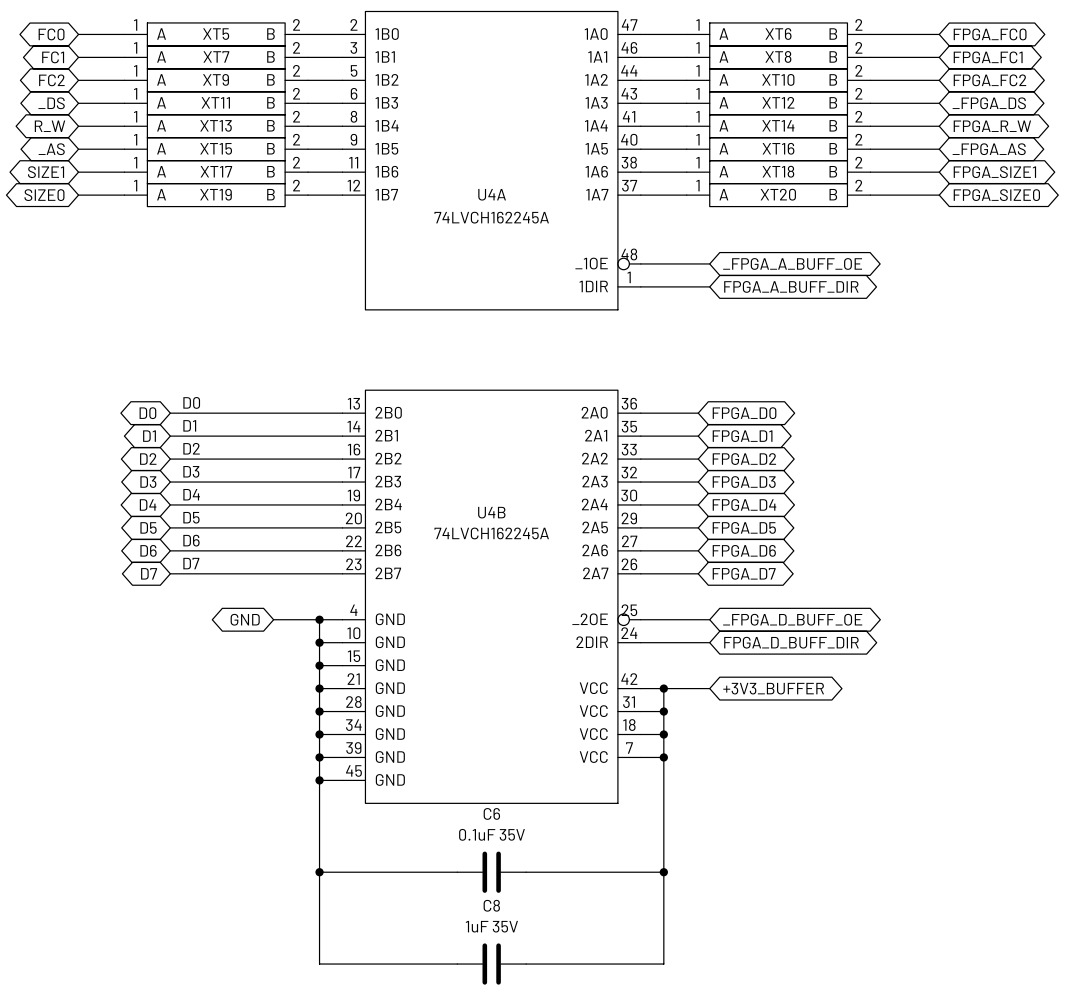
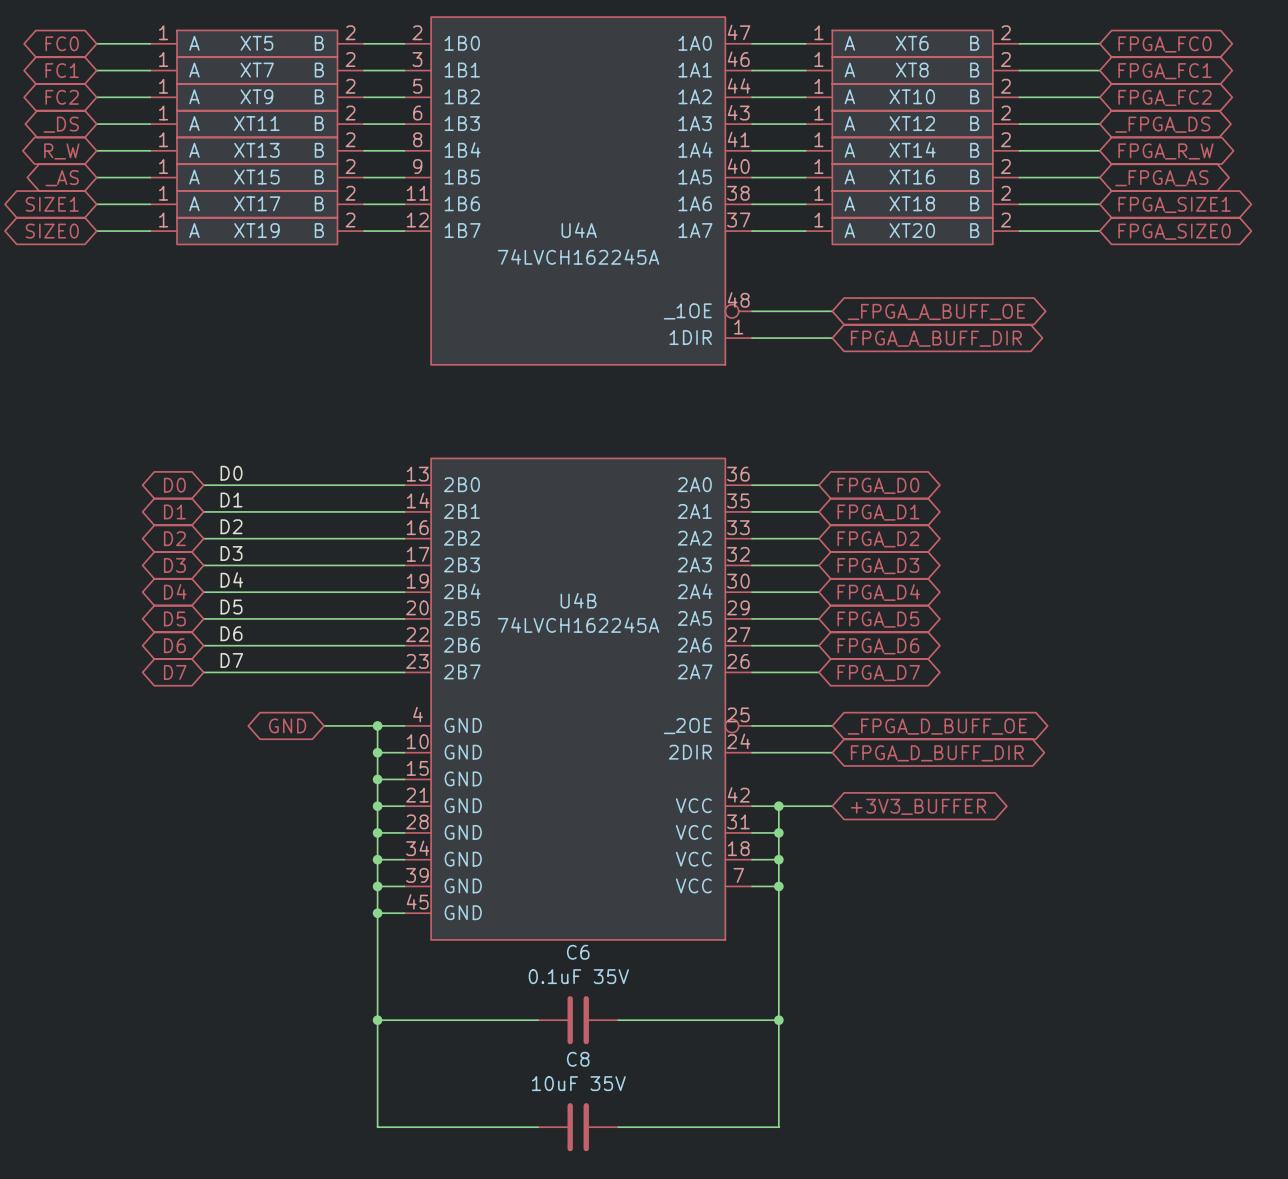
C8 value: 1uF 35V (491, 926) -> 10uF 35V (578, 1083)

